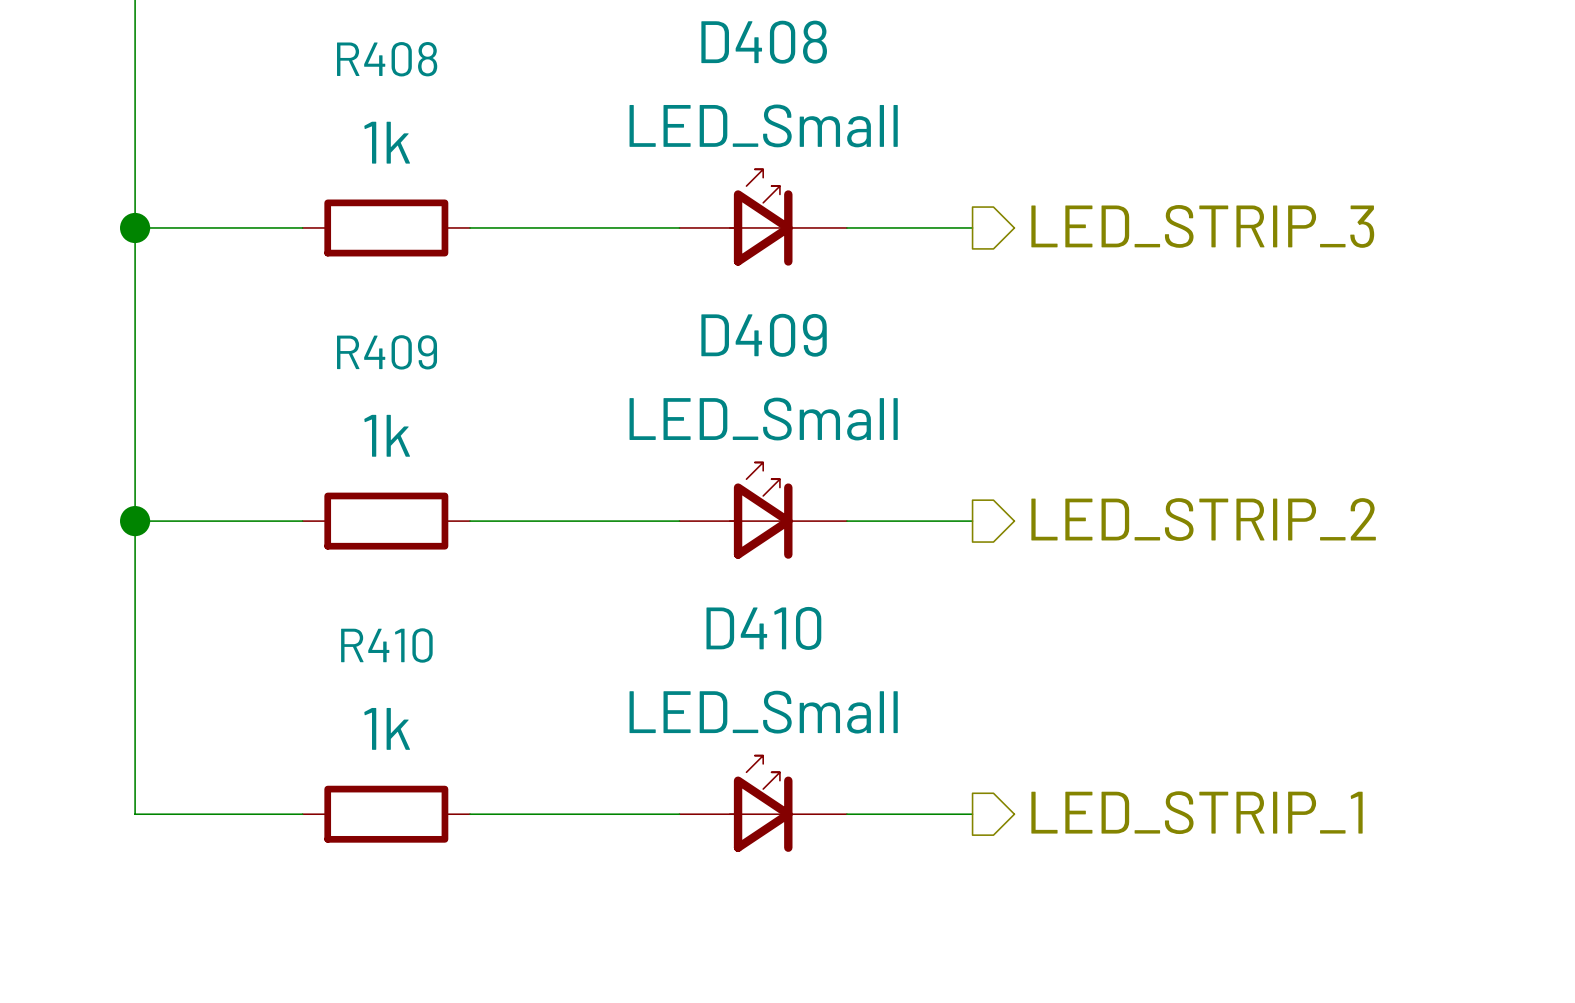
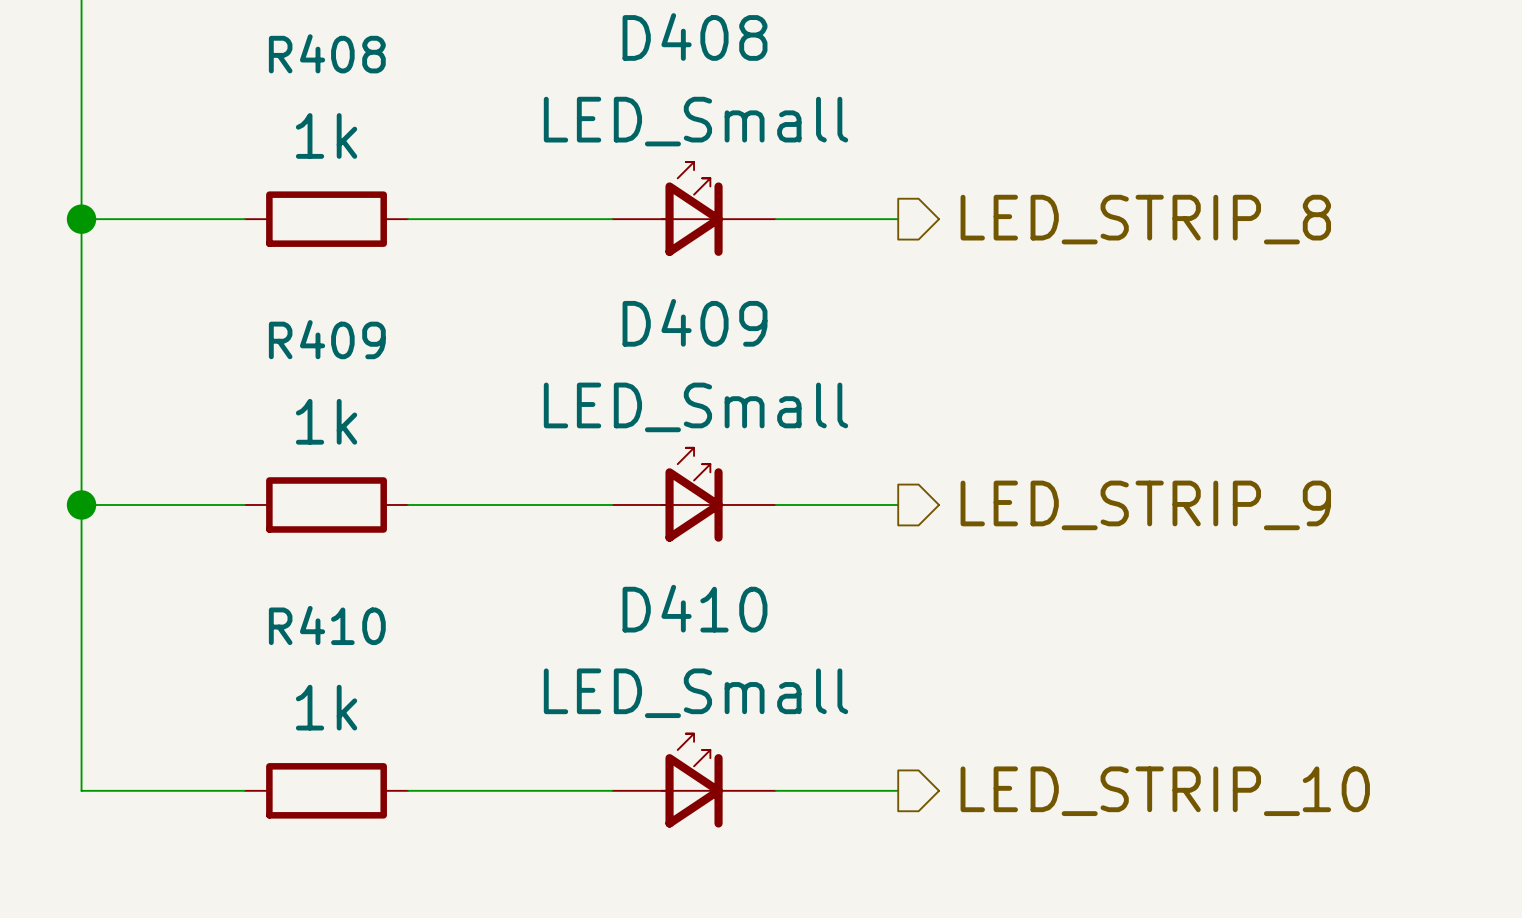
hierarchical label: LED_STRIP_3 (1202, 226) -> LED_STRIP_8 (1145, 219)
hierarchical label: LED_STRIP_2 (1203, 519) -> LED_STRIP_9 (1145, 505)
hierarchical label: LED_STRIP_1 (1197, 812) -> LED_STRIP_10 (1165, 791)

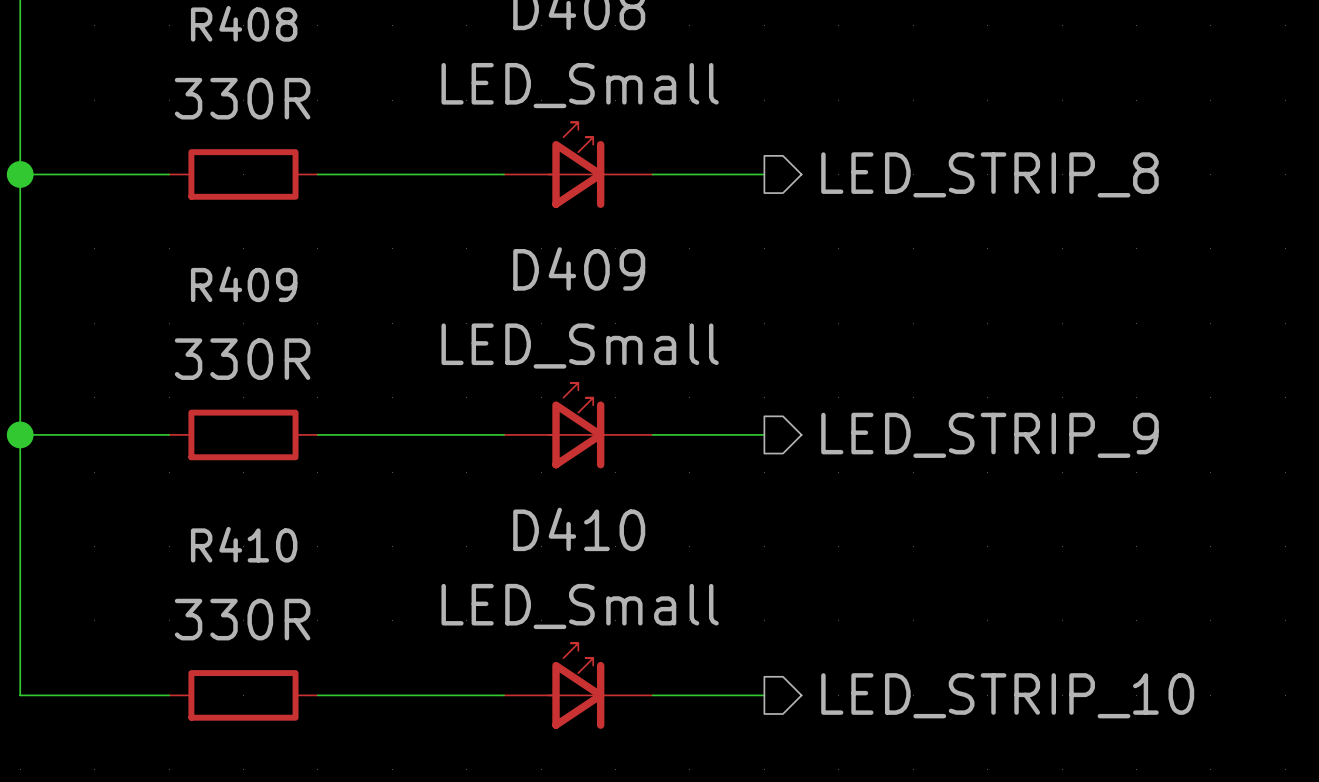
R408 value: 1k (326, 135) -> 330R (242, 98)
R409 value: 1k (326, 421) -> 330R (242, 359)
R410 value: 1k (326, 707) -> 330R (242, 619)

